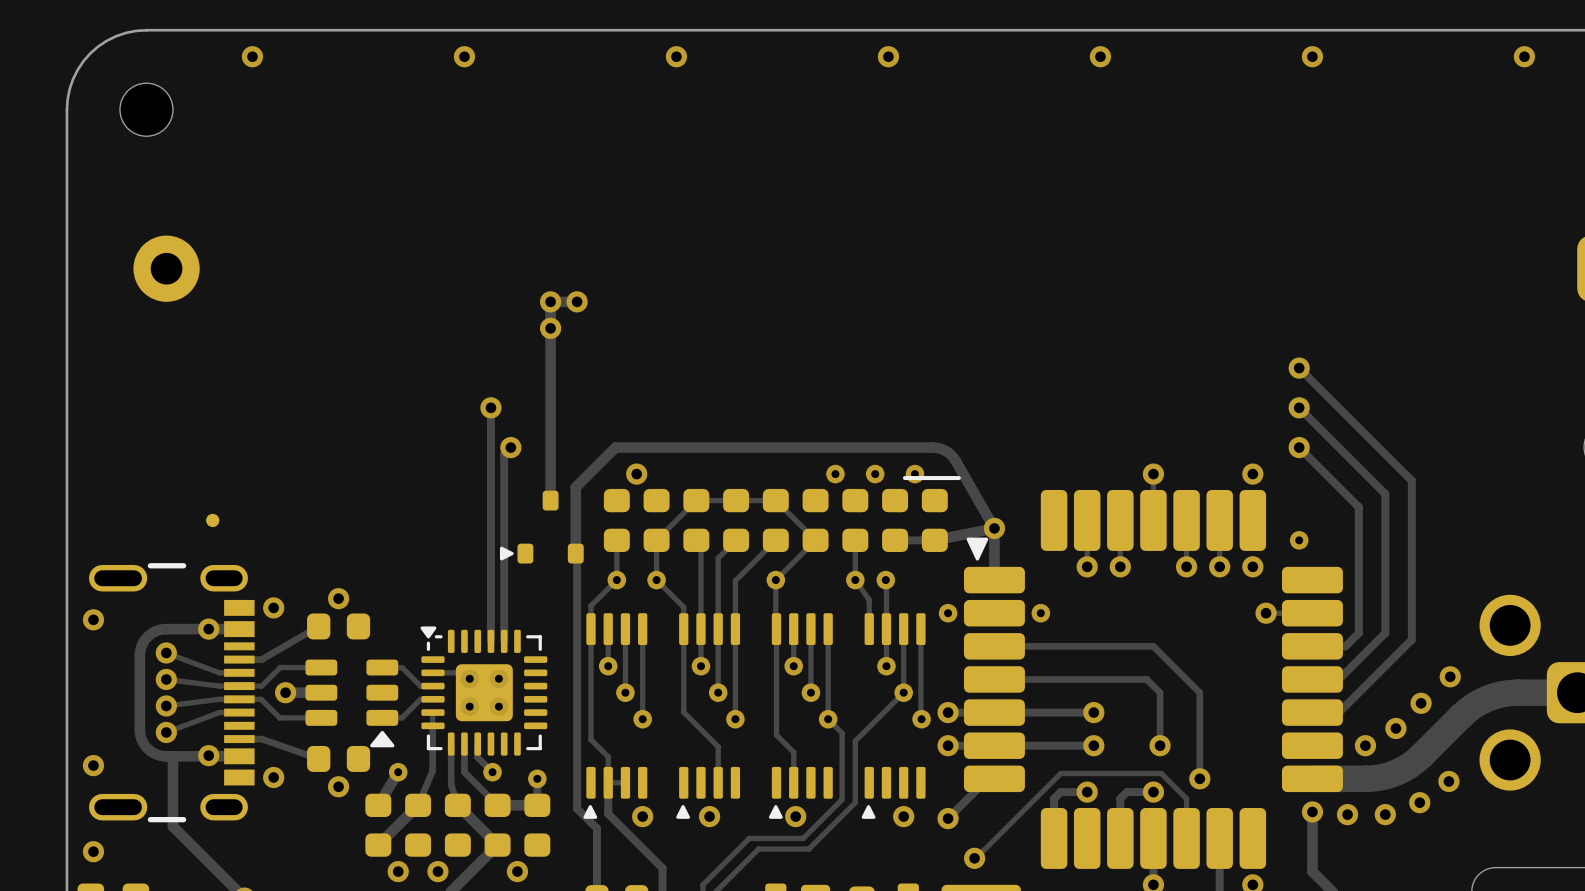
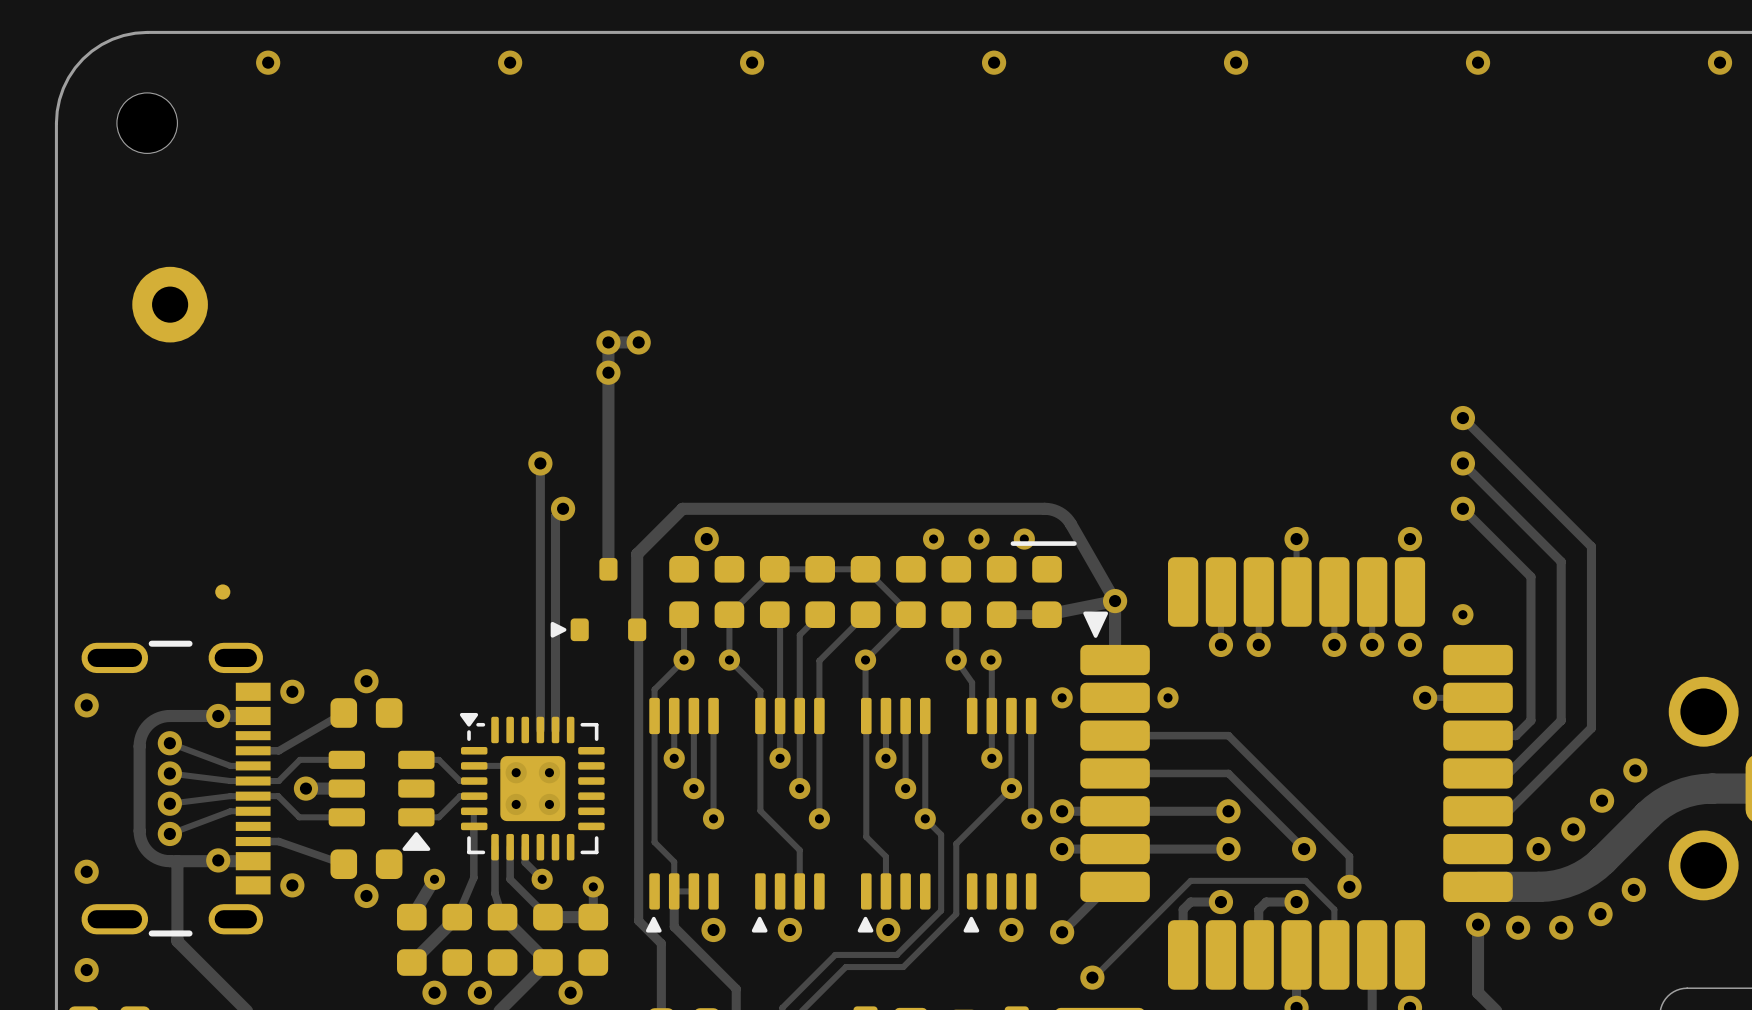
track: (1093, 646) (1153, 646) (1199, 692) (1199, 752) -> (1228, 735) (1349, 856)
track: (1093, 679) (1146, 679) (1160, 692) (1160, 745) -> (1228, 773) (1304, 849)

